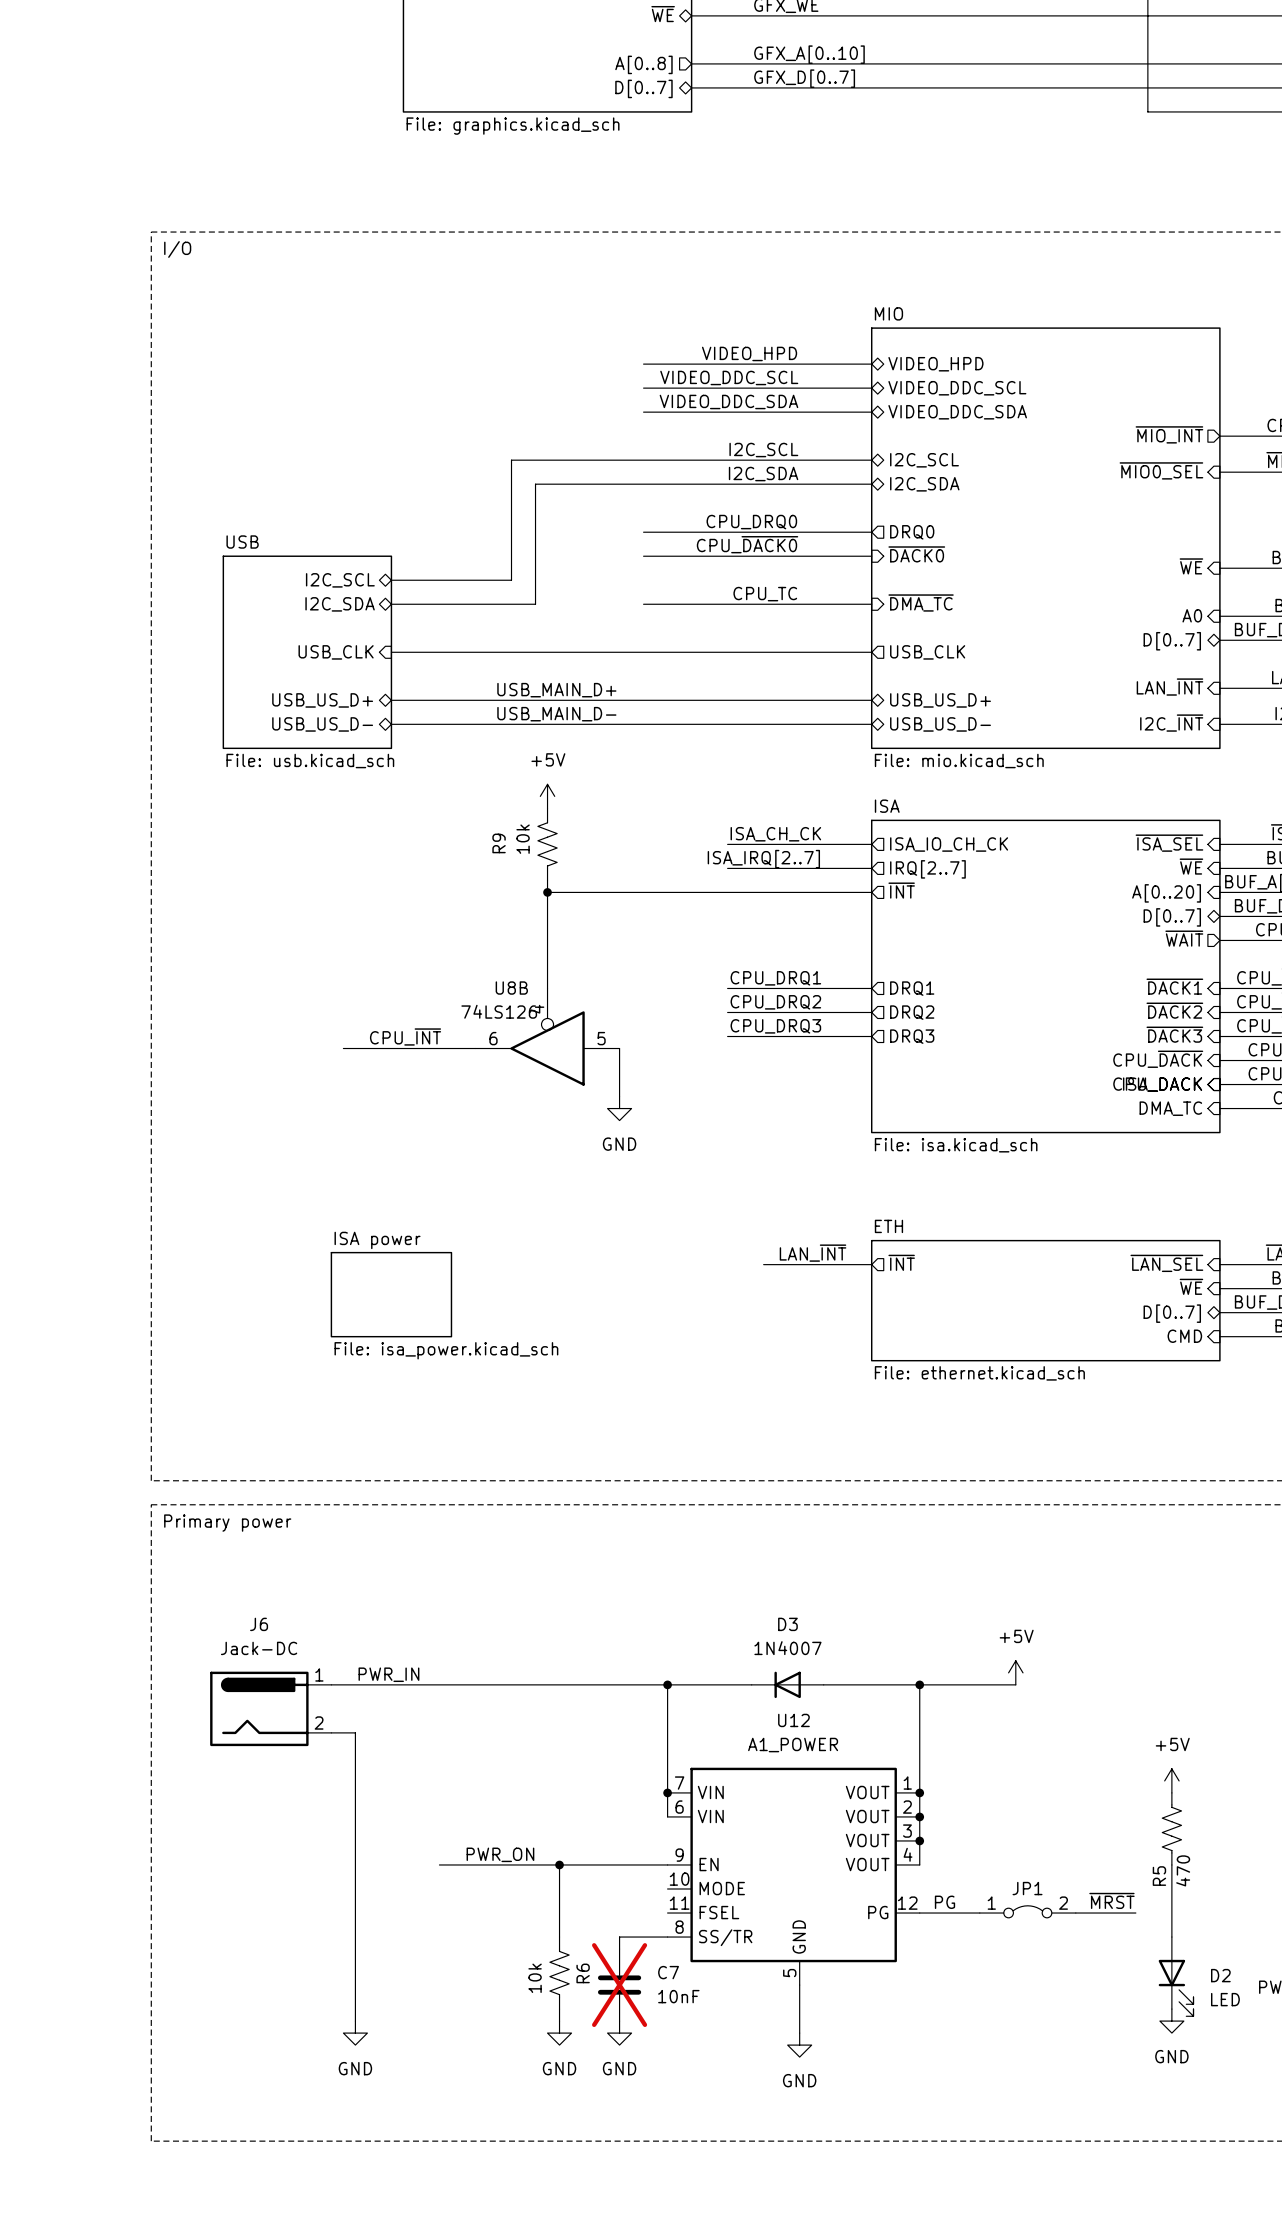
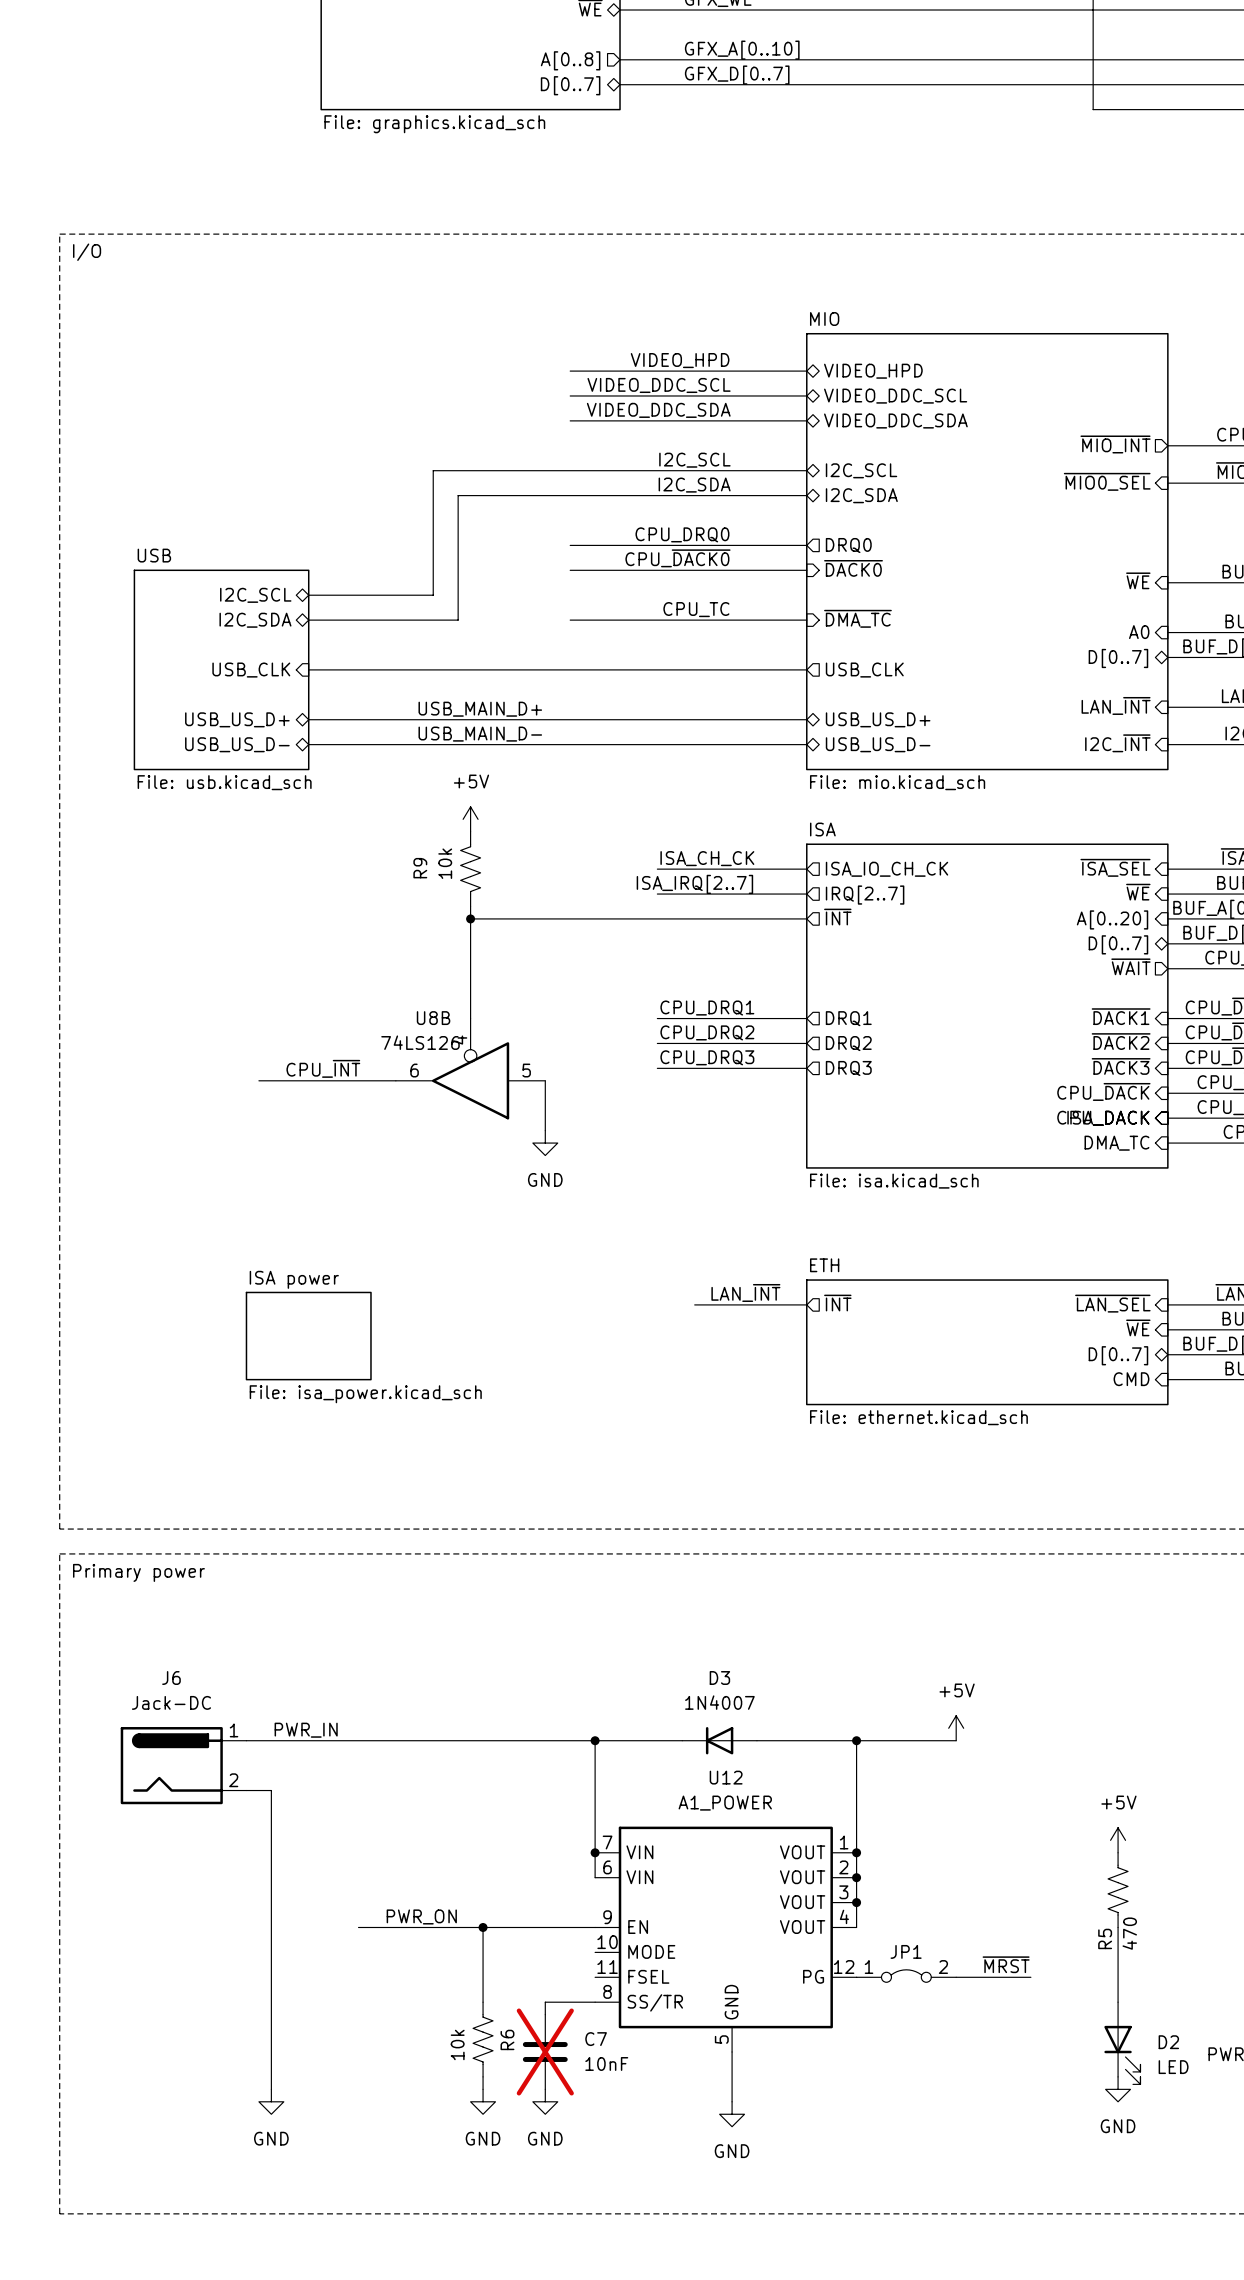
label position: ~{MRST} (1111, 1900) -> ~{MRST} (1006, 1964)
label: PG (944, 1902) -> none
JP1 position: (1027, 1911) -> (906, 1976)
wire: (919, 1913) (979, 1913) -> (956, 1977) (1018, 1977)
wire: (1087, 1913) (1135, 1913) -> none

